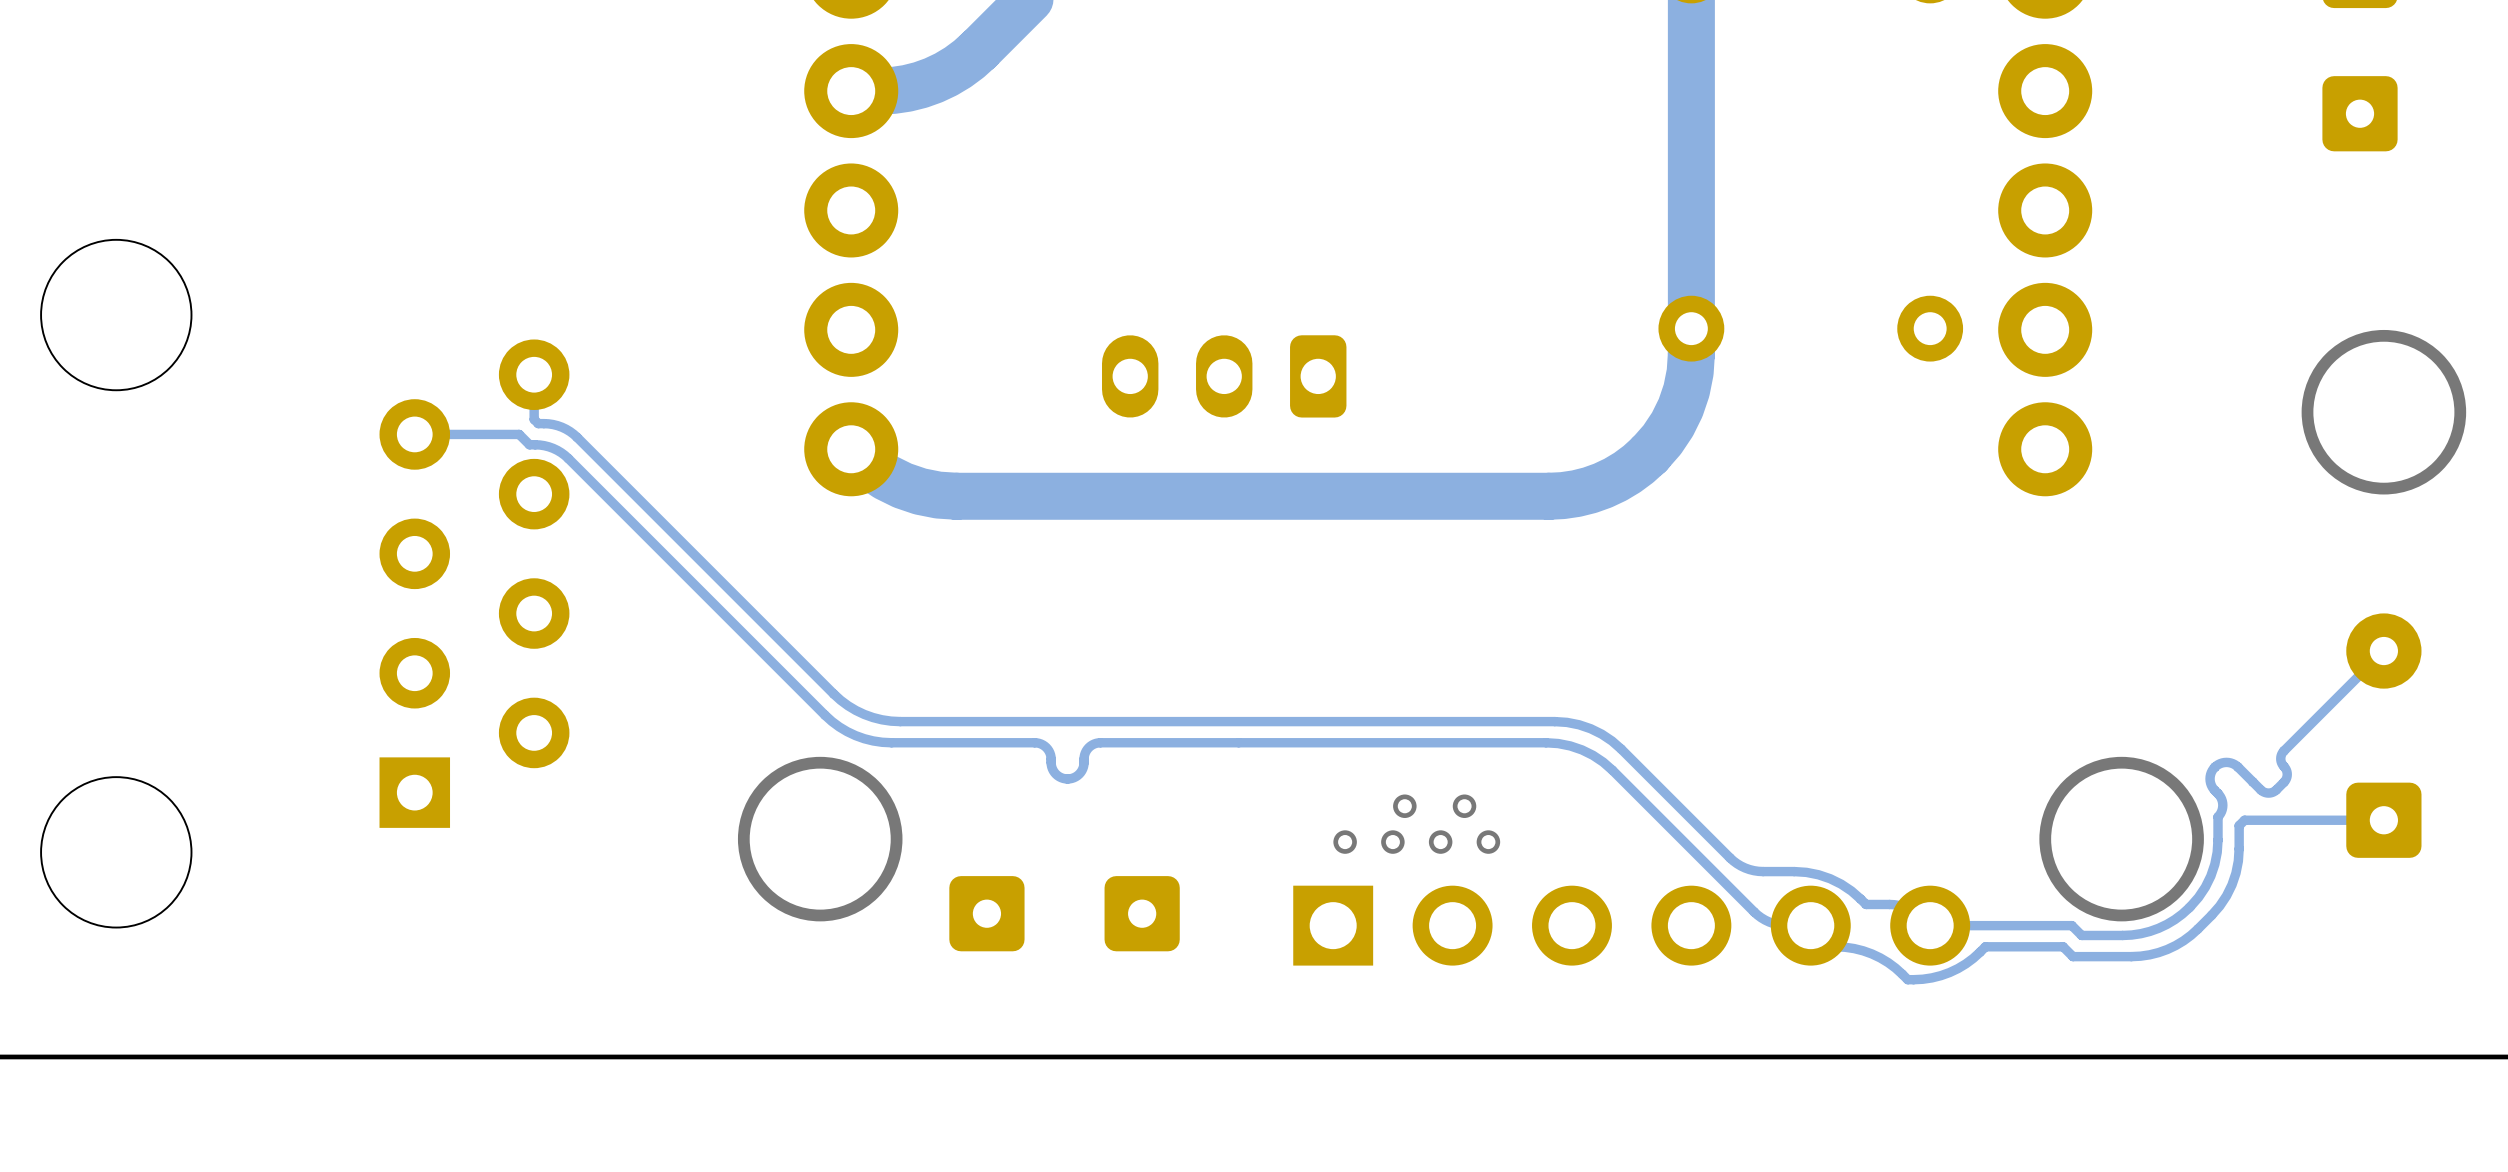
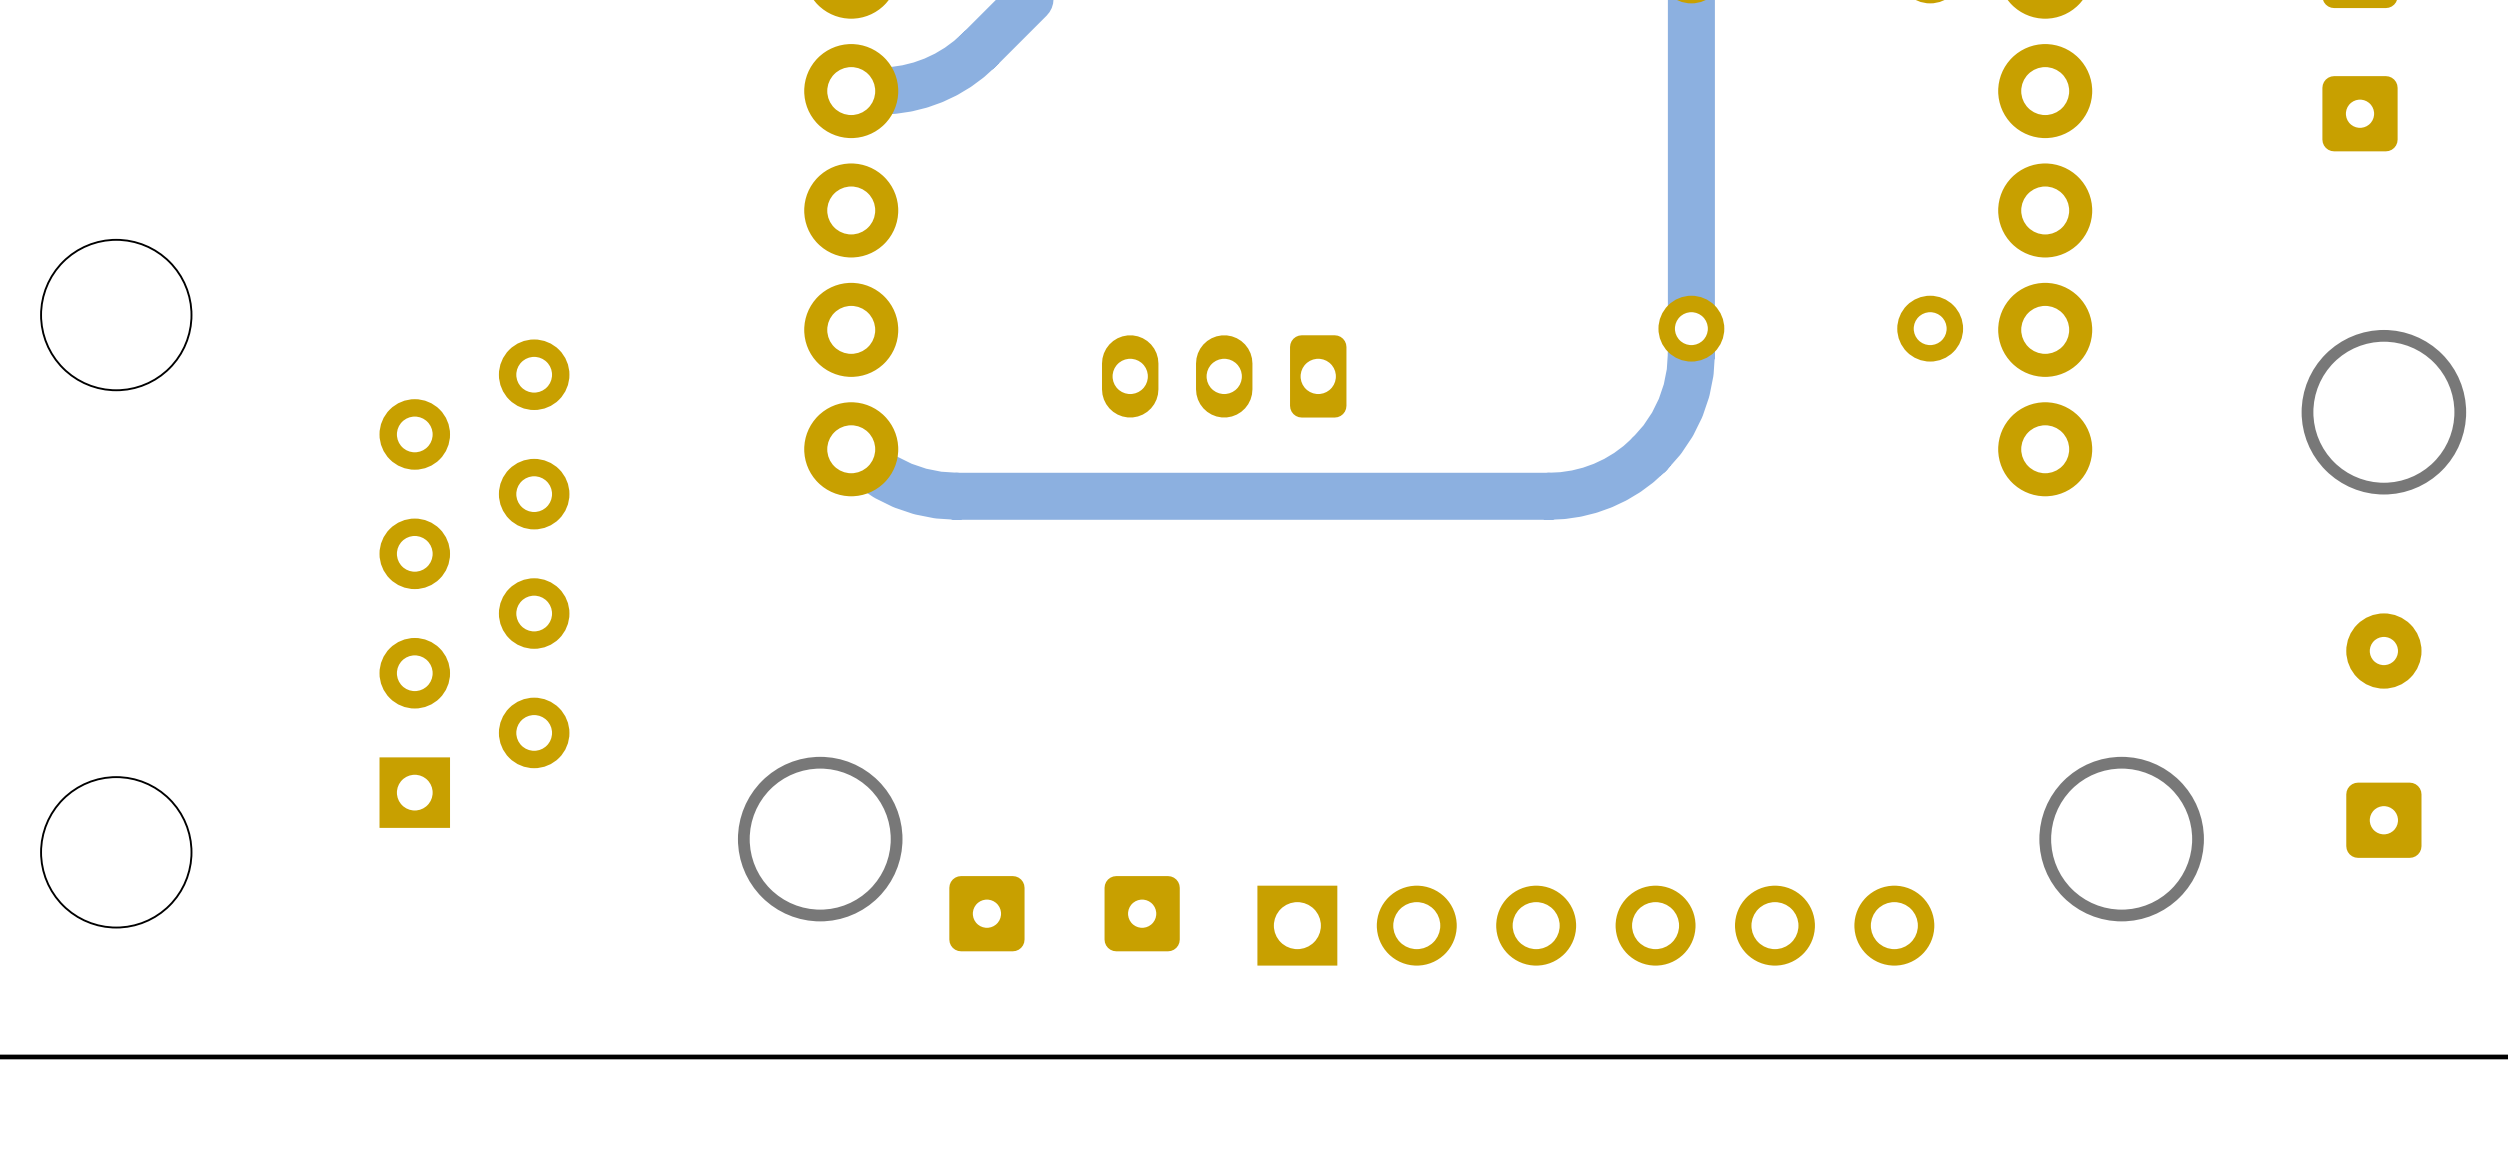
track: (534, 374) (534, 419) (538, 423) (561, 427) (573, 434) (833, 694) (848, 705) (864, 714) (881, 719) (900, 721) (1567, 722) (1590, 728) (1611, 741) (1729, 857) (1741, 866) (1758, 871) (1794, 871) (1818, 874) (1841, 884) (1866, 904) (1903, 906) (1915, 912) (1930, 925) (2071, 925) (2081, 935) (2122, 935) (2149, 931) (2174, 919) (2198, 897) (2210, 876) (2214, 864) (2217, 852) (2218, 816) (2222, 805) (2220, 797) (2210, 783) (2210, 776) (2213, 768) (2222, 762) (2232, 763) (2262, 791) (2268, 793) (2274, 791) (2286, 777) (2286, 770) (2280, 760) (2283, 751) (2383, 651) -> none
track: (414, 434) (519, 434) (529, 444) (544, 445) (561, 452) (825, 715) (839, 726) (855, 735) (873, 740) (891, 742) (1038, 743) (1048, 750) (1054, 772) (1061, 777) (1067, 778) (1073, 777) (1080, 772) (1086, 750) (1092, 744) (1098, 742) (1546, 742) (1570, 745) (1593, 755) (1612, 770) (1761, 917) (1778, 924) (1810, 925) (1831, 946) (1854, 948) (1871, 953) (1888, 962) (1907, 979) (1931, 977) (1949, 972) (1965, 963) (1985, 946) (2063, 946) (2072, 956) (2131, 956) (2158, 952) (2175, 945) (2191, 935) (2211, 915) (2226, 895) (2232, 884) (2238, 861) (2239, 825) (2244, 820) (2383, 820) -> none
via: (1404, 806) -> none
via: (1464, 806) -> none
via: (1345, 842) -> none
via: (1392, 842) -> none
via: (1440, 842) -> none
via: (1488, 842) -> none
part position: (1631, 925) -> (1595, 925)

